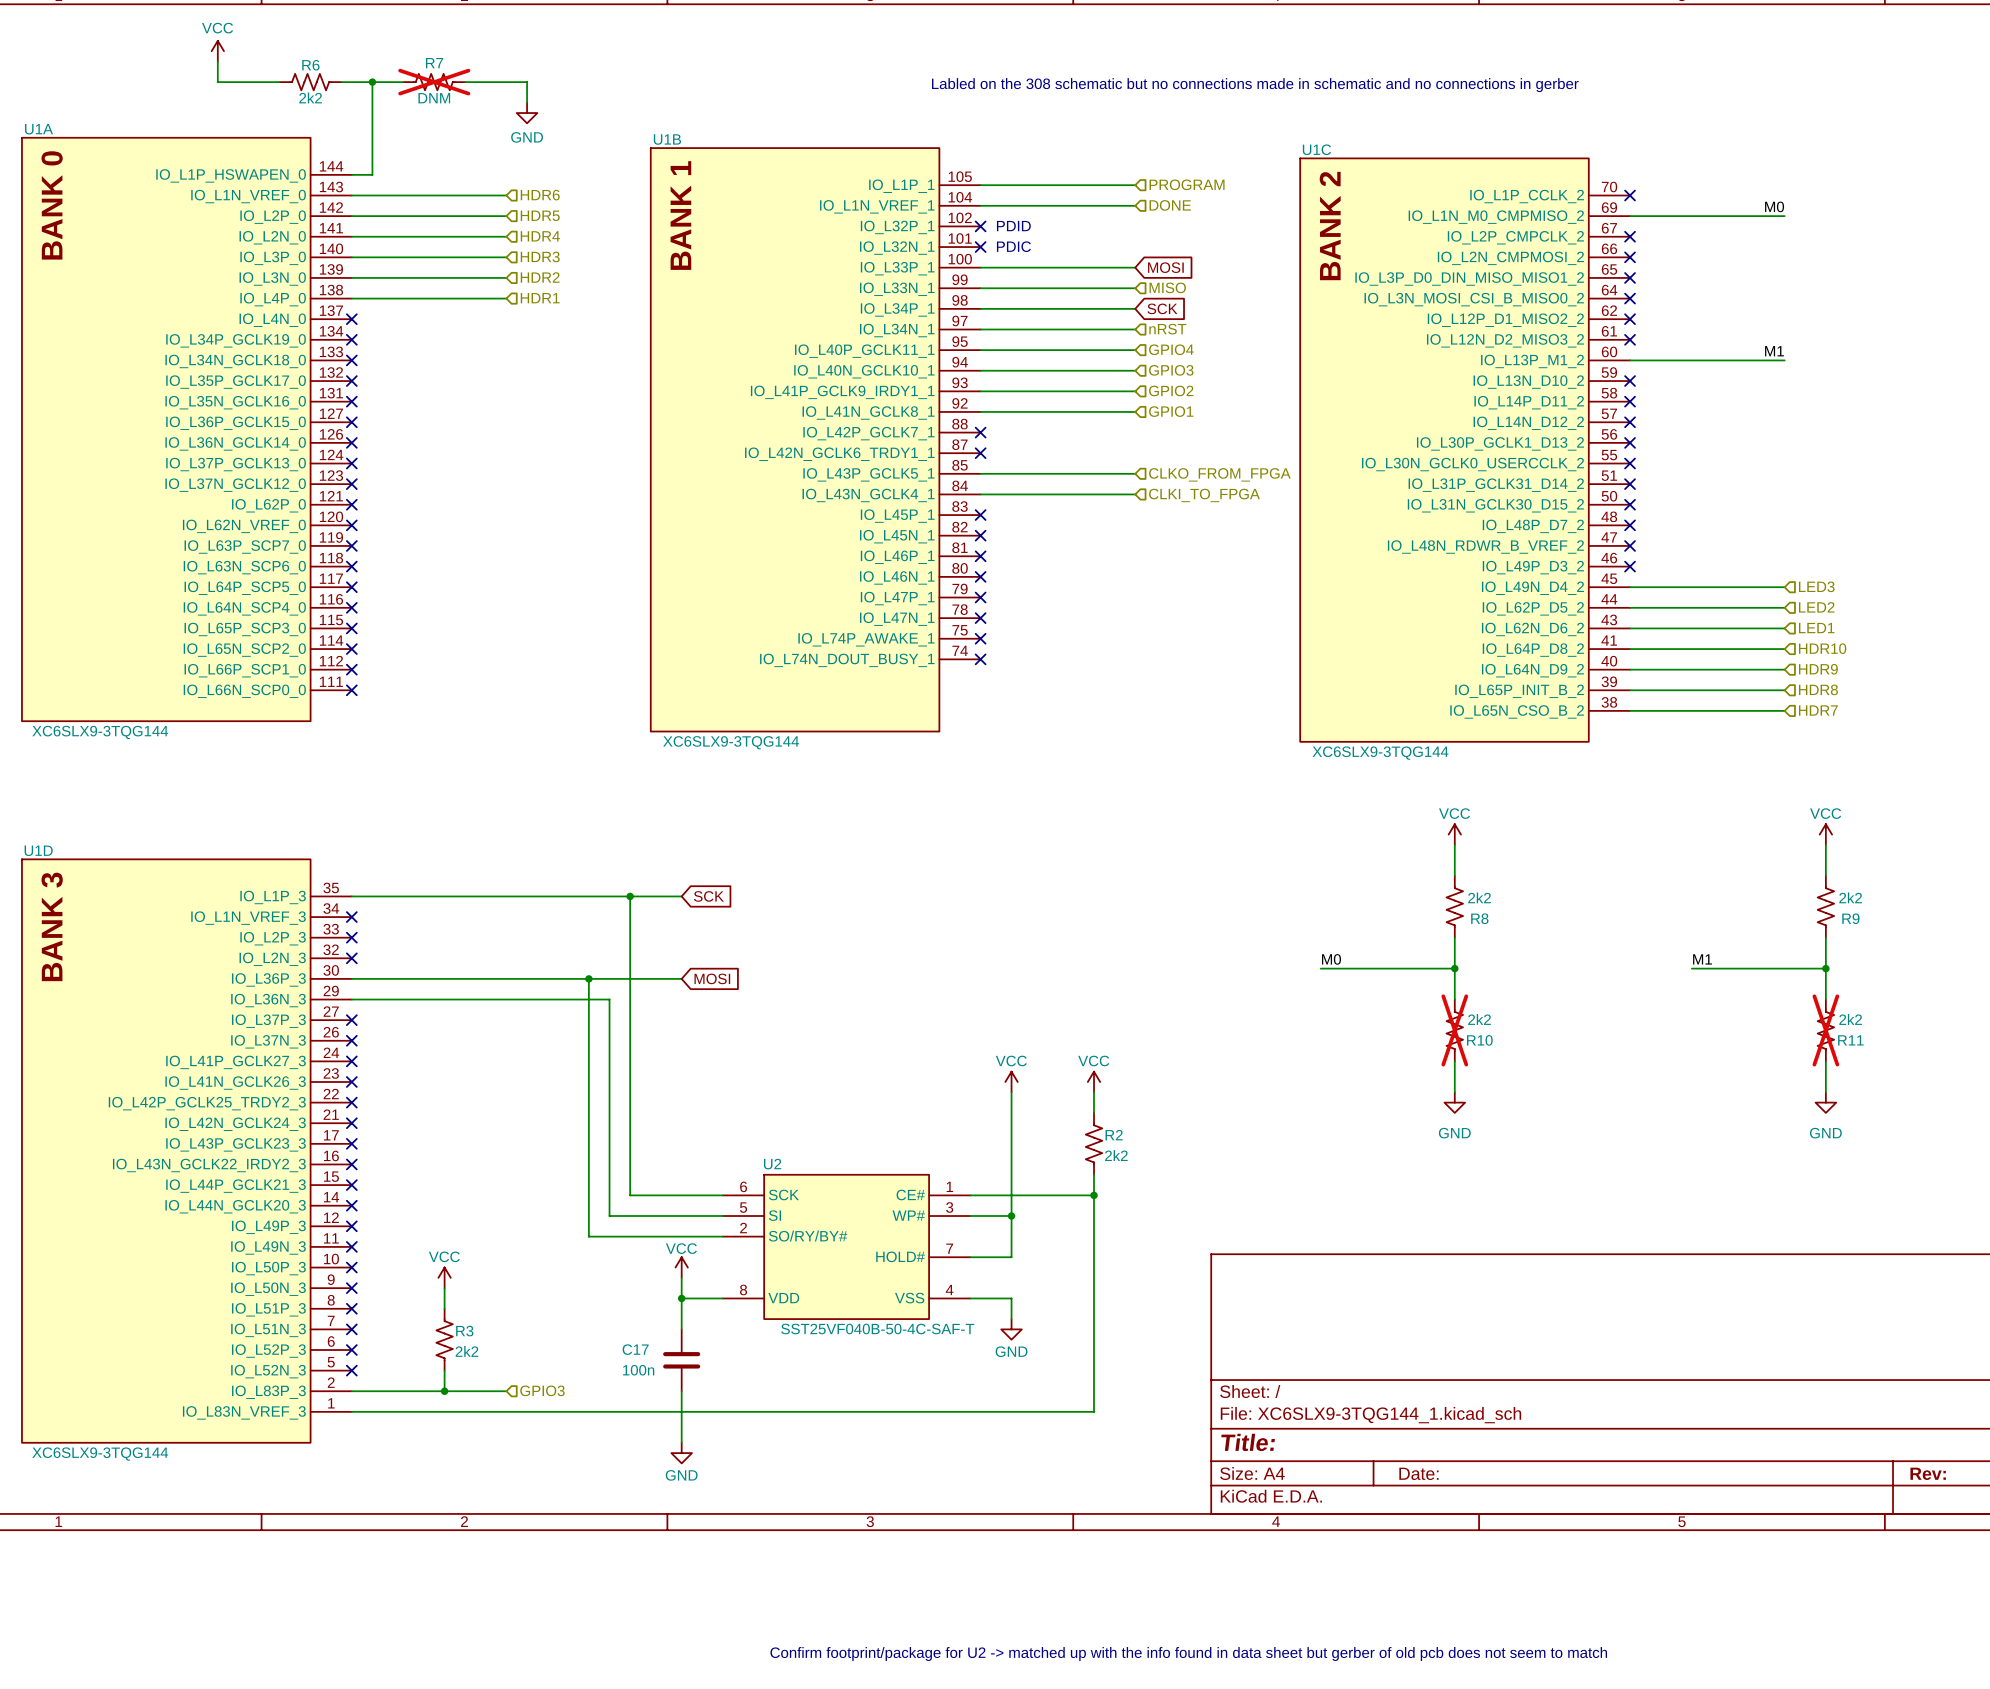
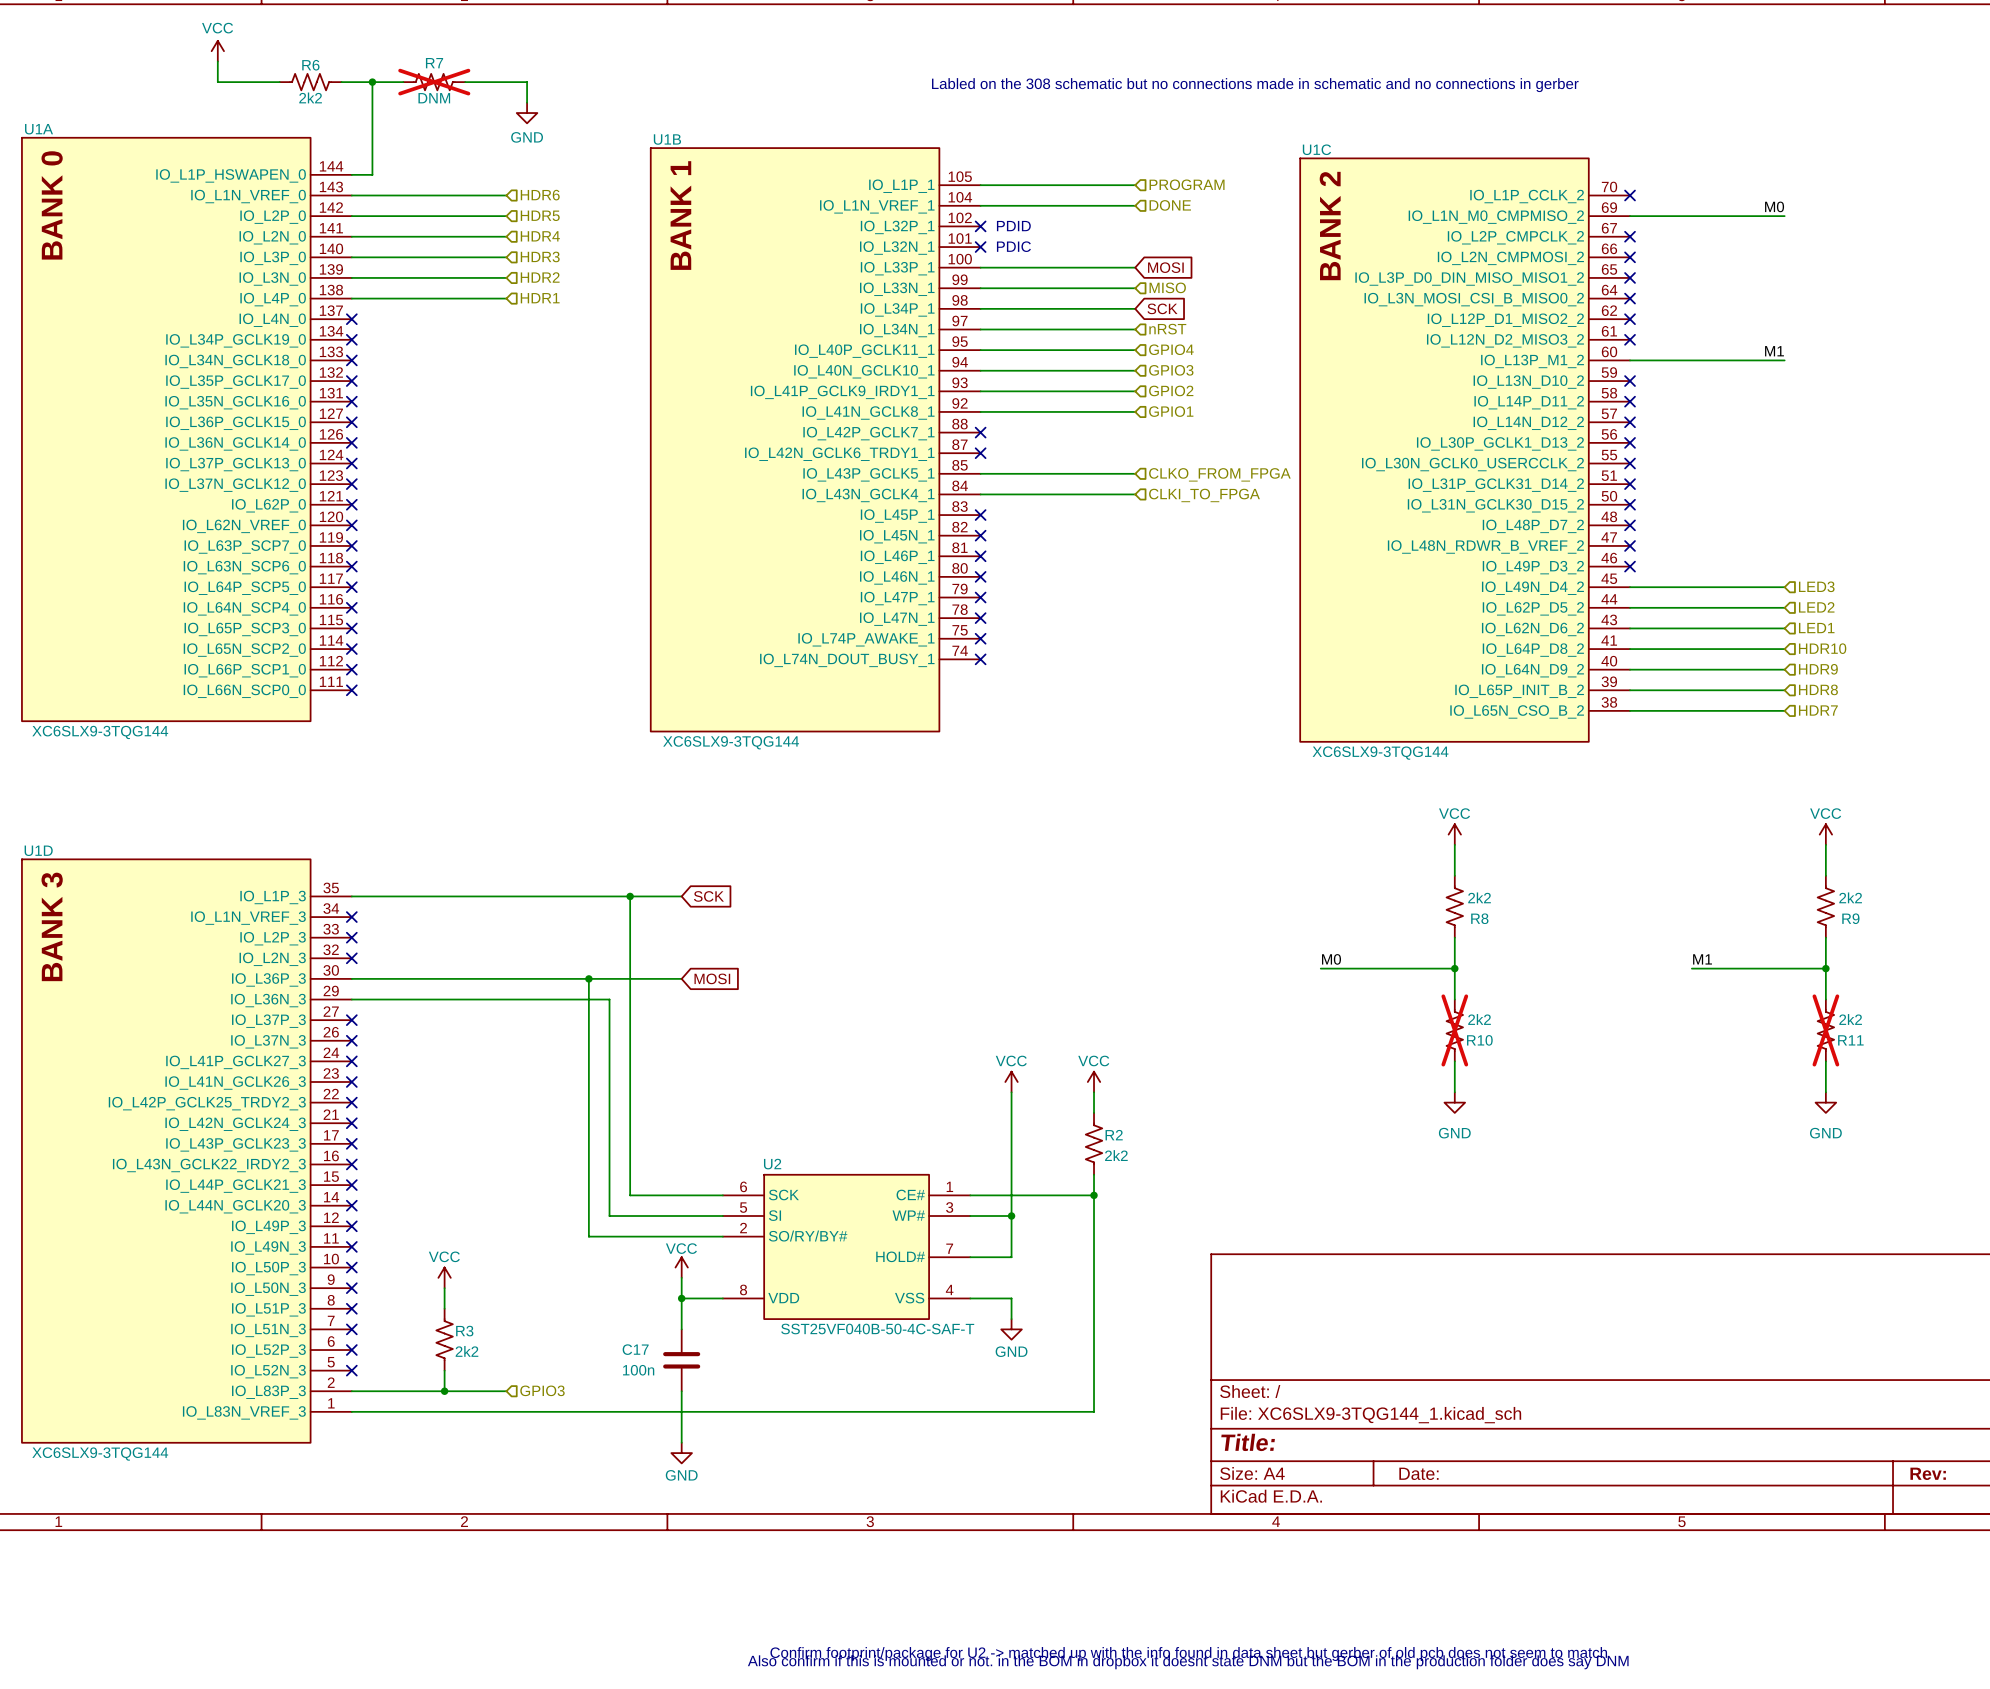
text: none -> Also confirm if this is mounted or not. in the BOM in dropbox it doesnt state DNM but the BOM in the production folder does say DNM (1188, 1662)

